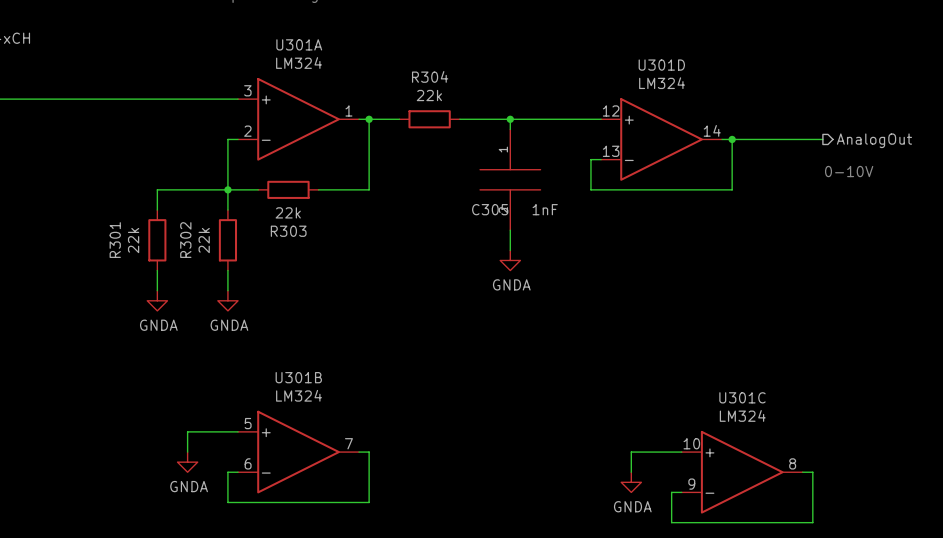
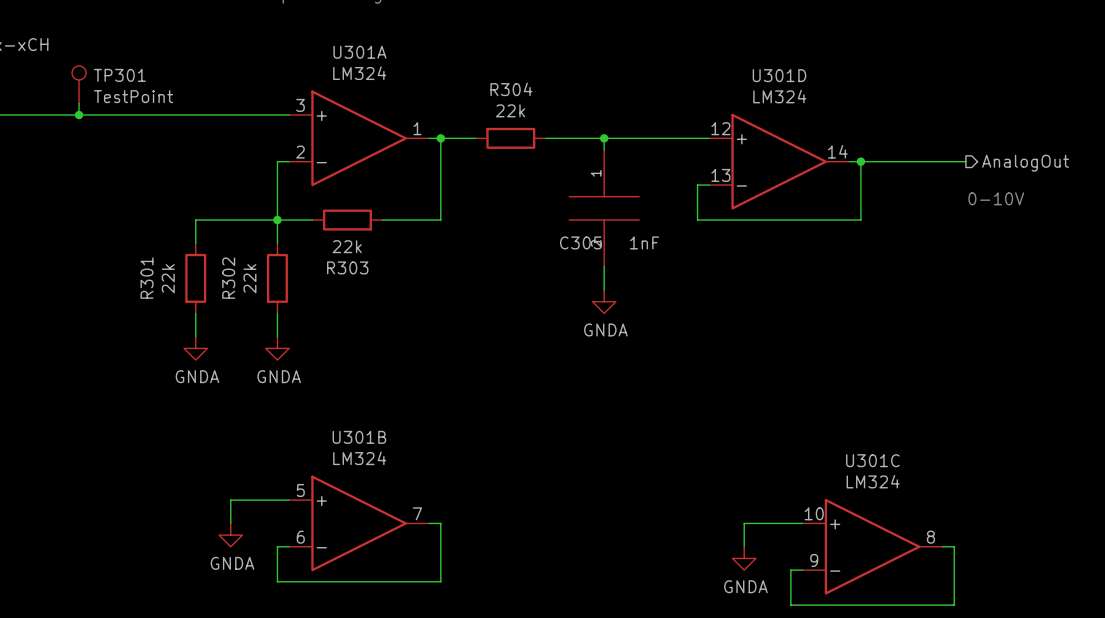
TP301: none -> TestPoint (79, 84)
wire: none -> (79, 103) (79, 115)
junction: none -> (79, 115)

